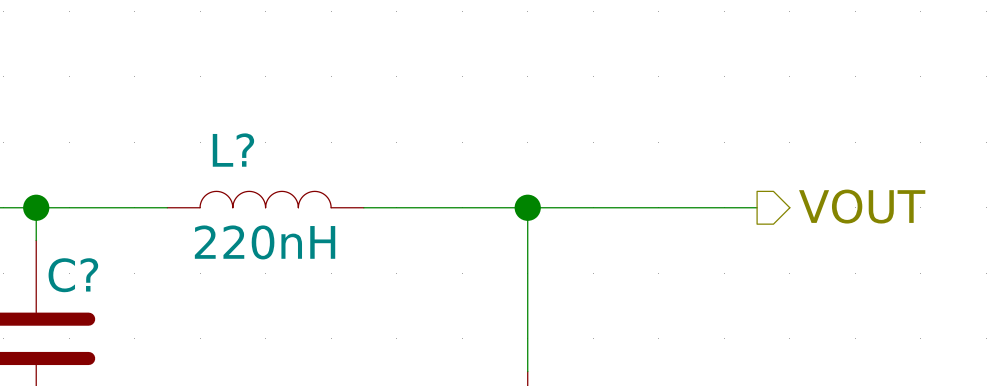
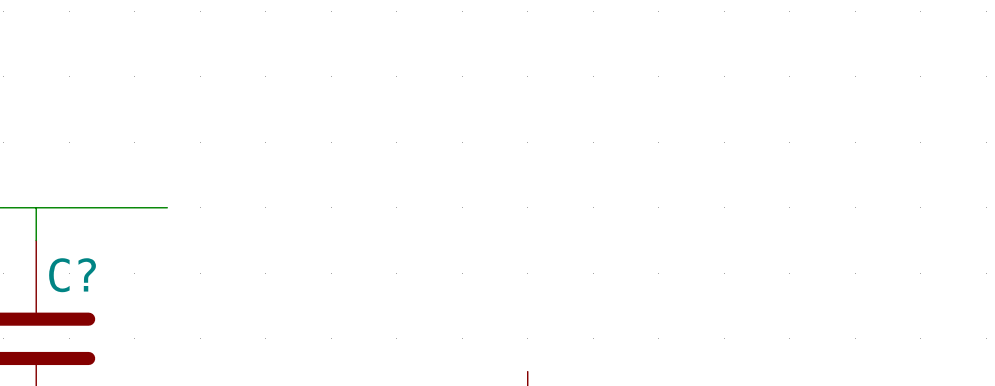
L?: (265, 199) -> none
hierarchical label: VOUT (862, 206) -> none
junction: (36, 207) -> none
wire: (363, 207) (757, 207) -> none
wire: (527, 207) (527, 371) -> none
junction: (527, 207) -> none

